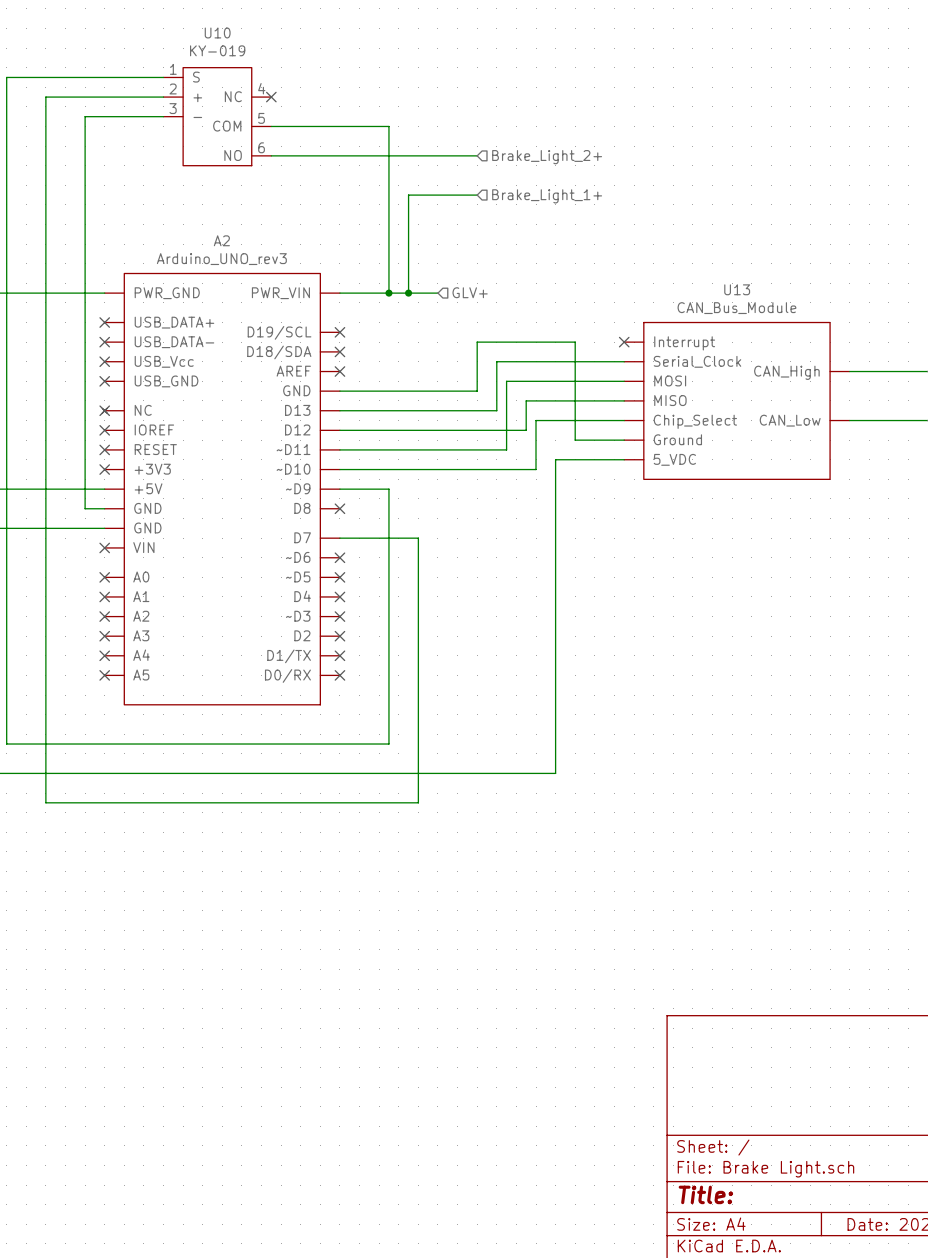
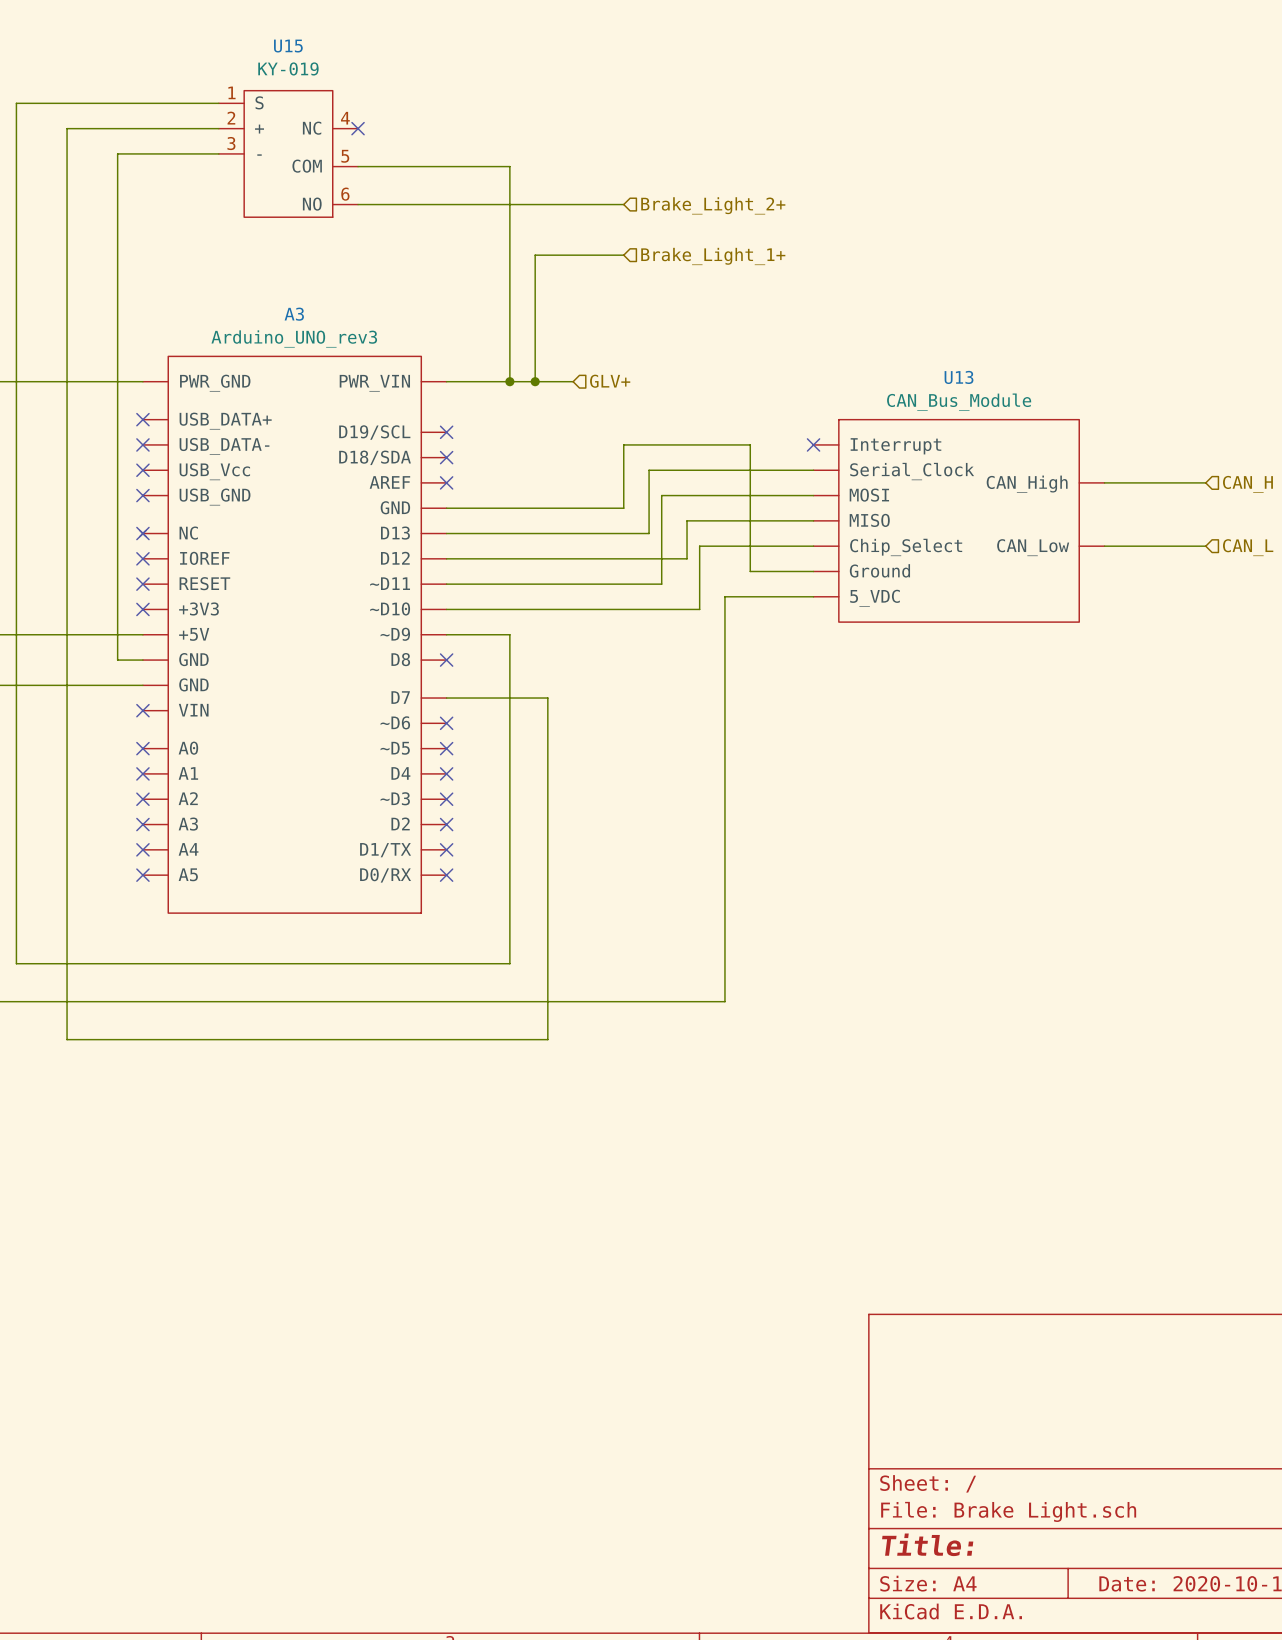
U10 name: U10 (217, 32) -> U15 (288, 46)
A2 name: A2 (221, 240) -> A3 (294, 314)

